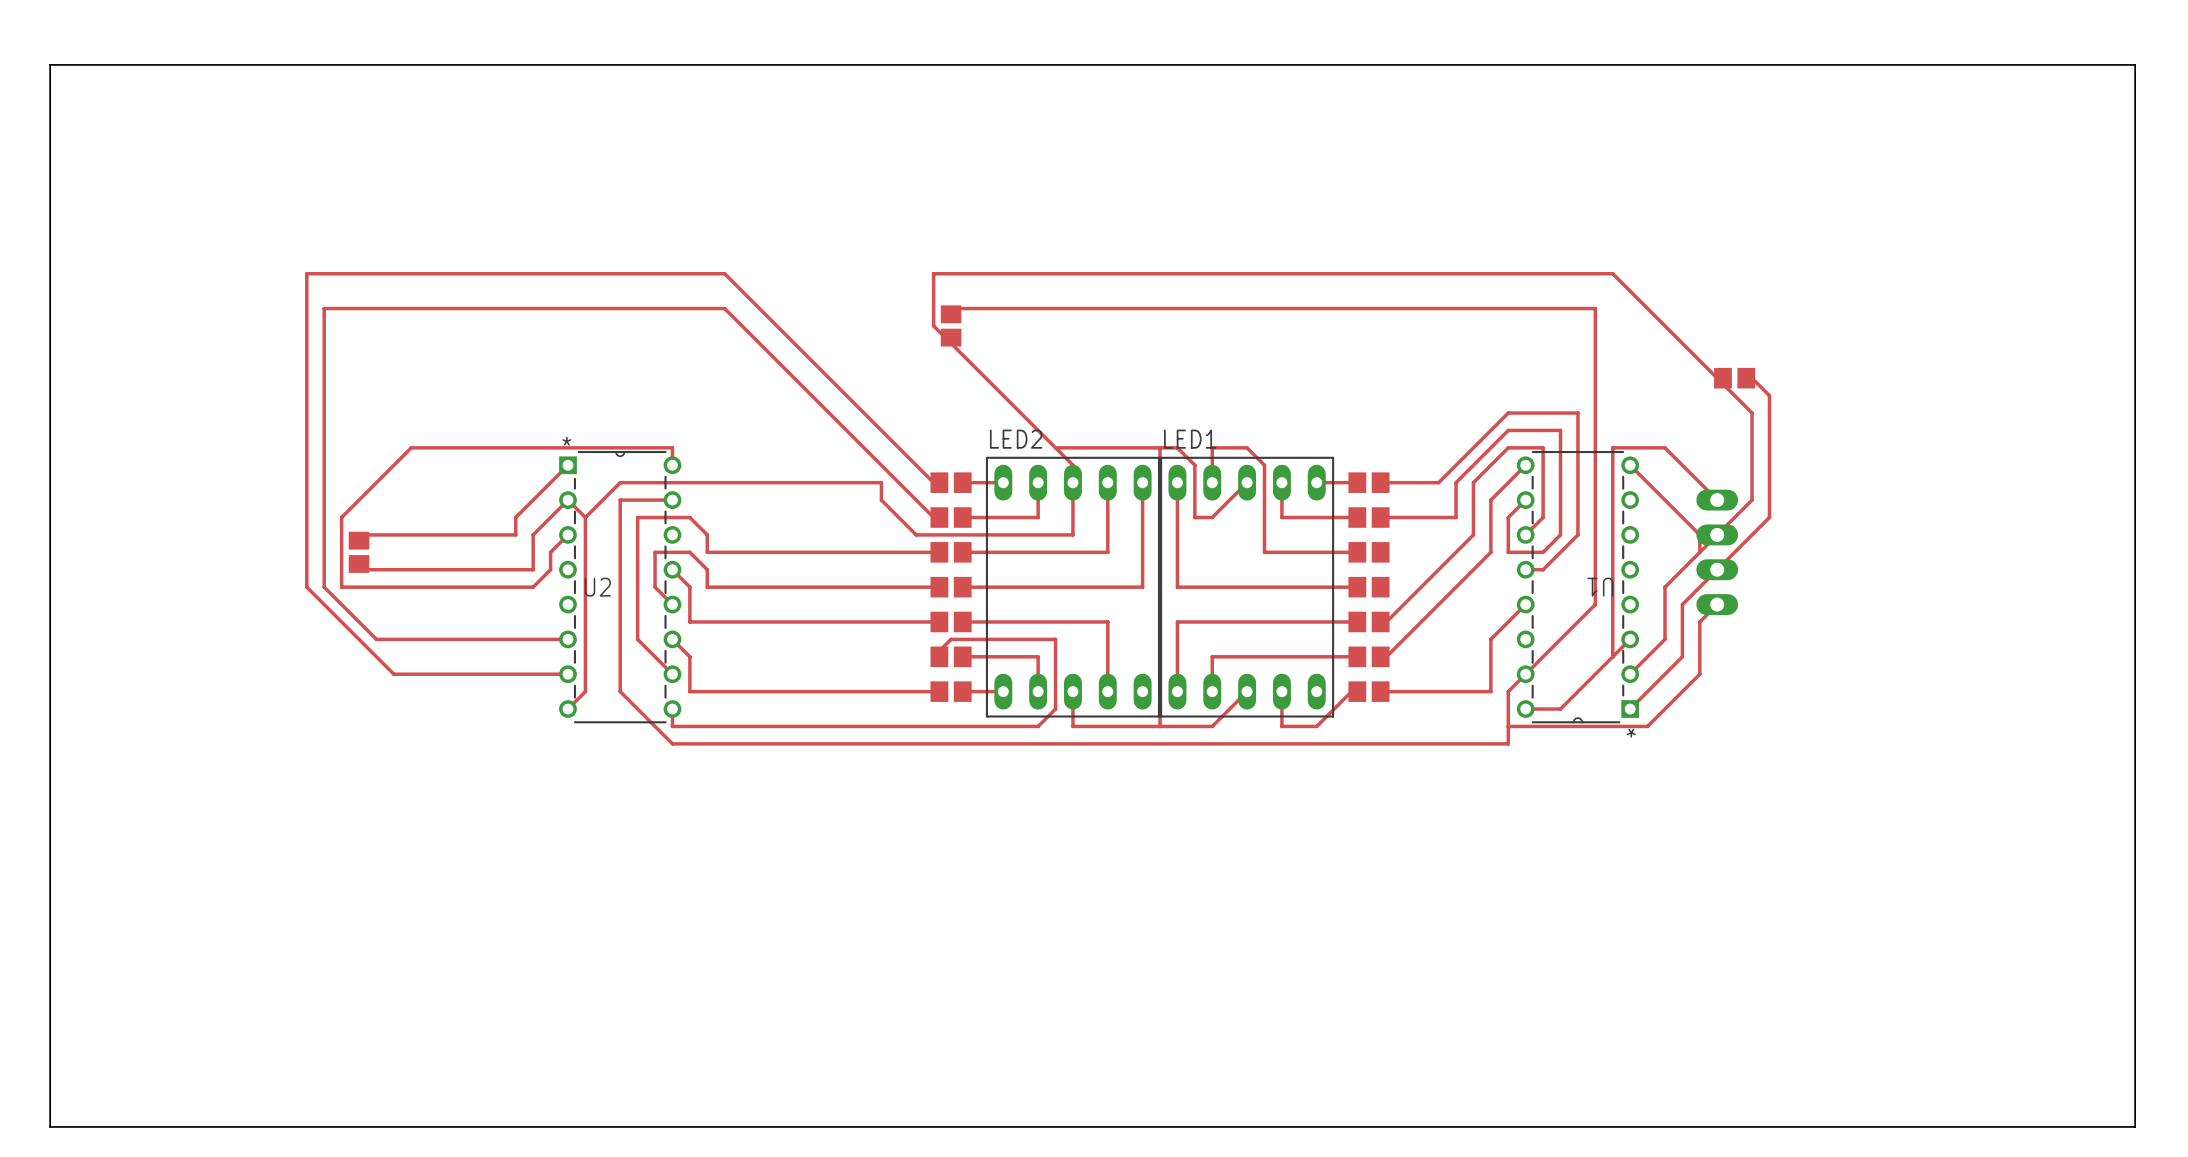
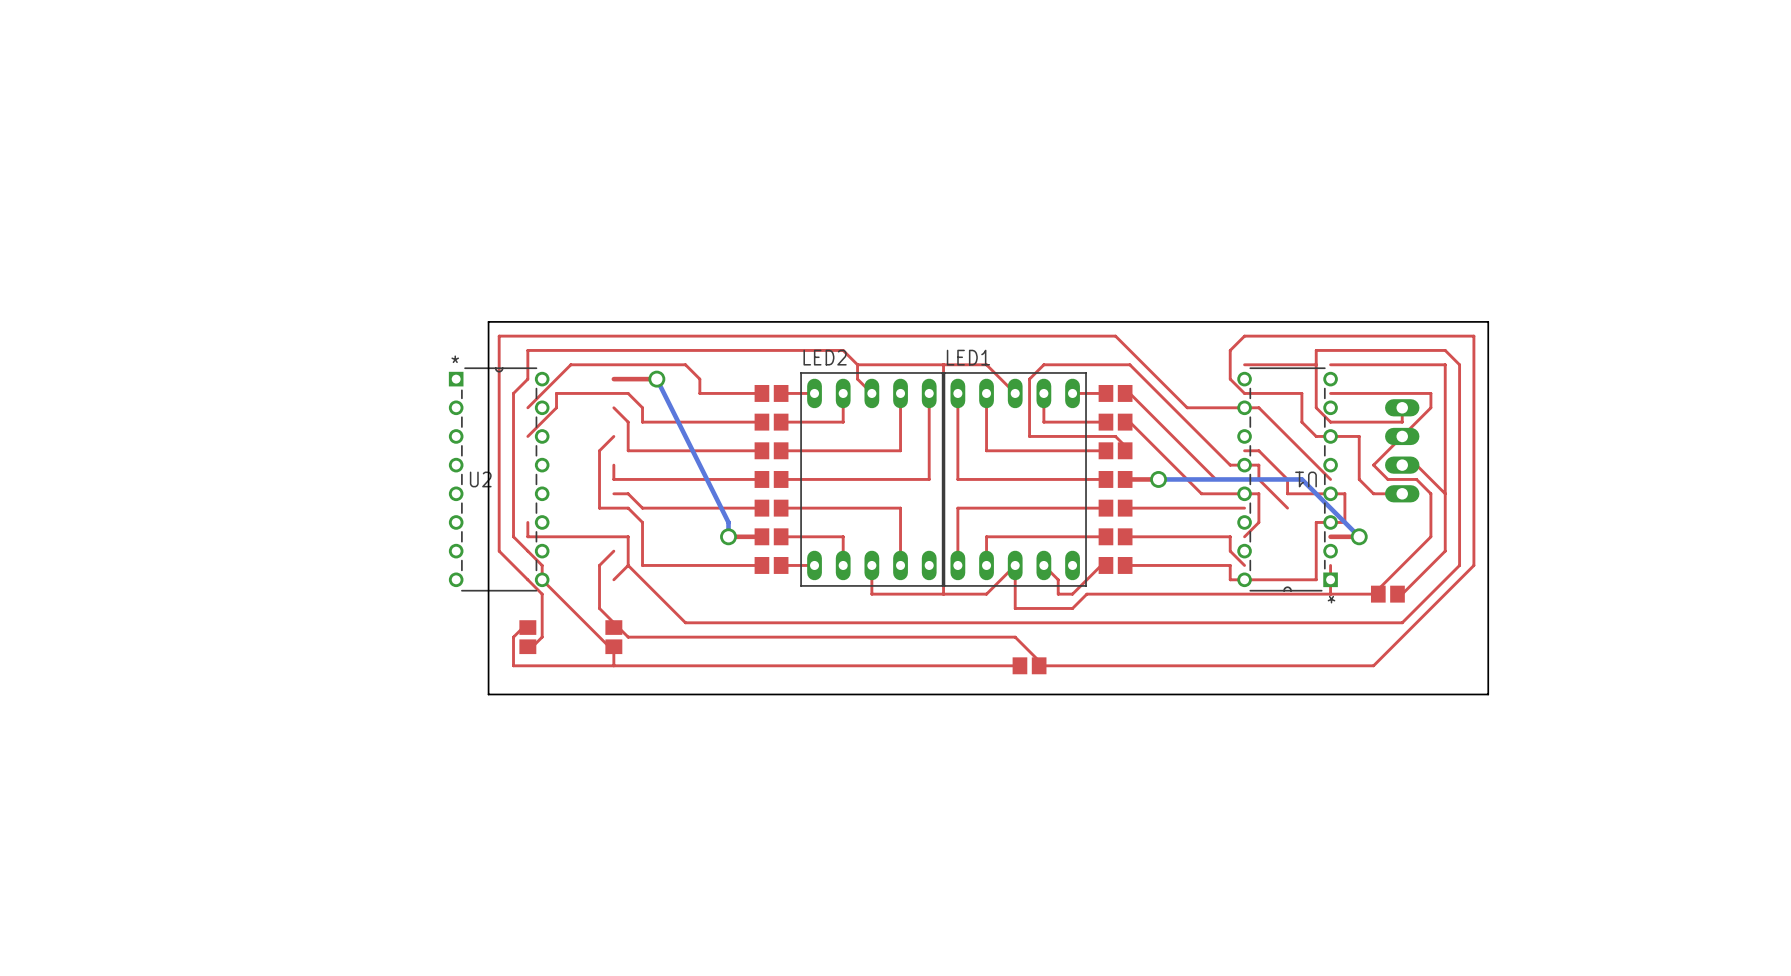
board edge: (2135, 64) (50, 64) (50, 1126) (2135, 1126) (2135, 64) -> none
top track: (951, 314) (951, 308) (1595, 308) (1595, 482) -> (1244, 336) (1230, 350) (1230, 379) (1244, 393) (1301, 393)
part: (951, 325) -> none
part: (1734, 378) -> none
top track: (1746, 378) (1752, 378) (1769, 395) (1769, 447) -> none
board edge: none -> (1488, 321) (488, 321) (488, 694) (1488, 694) (1488, 321)
top track: (1525, 413) (1508, 413) (1438, 482) (1386, 482) -> (1244, 479) (1215, 479) (1129, 393)
top track: (1577, 413) (1577, 534) (1543, 569) -> (1287, 508) (1258, 479) (1258, 465)
top track: none -> (1287, 336) (1473, 336) (1473, 565) (1373, 665) (1039, 665)
top track: (1038, 430) (933, 325) (933, 273) (1612, 273) (1752, 413) (1752, 482) -> (1330, 393) (1430, 393)
top track: none -> (843, 350) (527, 350) (527, 379) (513, 393) (513, 422)
top track: (1055, 447) (1072, 465) (1072, 534) (916, 534) (881, 500) (881, 482) -> (757, 393) (714, 393)
top track: none -> (857, 364) (857, 379) (871, 393)
top track: (1177, 447) (1194, 465) (1194, 517) (1212, 517) (1247, 482) -> (957, 364) (986, 364) (1015, 393)
top track: (1525, 447) (1508, 447) (1473, 482) (1473, 534) (1386, 621) -> (1244, 508) (1129, 508)
top track: (1543, 447) (1543, 517) (1525, 534) -> (1258, 364) (1316, 364) (1316, 350) (1445, 350) (1459, 364) (1459, 565) (1402, 622) (685, 622) (628, 565)
top track: (1630, 447) (1612, 447) -> (1244, 579) (1230, 579)
top track: (1664, 447) (1717, 500) -> (1359, 364) (1445, 364)
top track: (567, 465) (515, 517) (515, 534) (359, 534) (359, 540) -> none
top track: (672, 465) (672, 447) (411, 447) (341, 517) (341, 587) (533, 587) (550, 569) (550, 552) (567, 534) -> none
top track: none -> (656, 379) (613, 379)
bottom track: none -> (656, 379) (728, 522) (728, 536)
via: none -> (656, 379)
top track: (1264, 465) (1247, 447) (1212, 447) (1212, 482) -> (1029, 379) (1043, 364) (1129, 364) (1230, 465) (1244, 465)
top track: (1525, 465) (1490, 500) (1490, 552) (1386, 656) -> (1244, 565) (1230, 551) (1230, 536) (1129, 536)
top track: (1630, 465) (1699, 534) (1699, 552) -> none
top track: (689, 482) (620, 482) (585, 517) -> (556, 393) (556, 407) (527, 436)
top track: (864, 482) (776, 482) -> (757, 422) (642, 422) (642, 407) (628, 393)
top track: none -> (699, 393) (699, 379) (685, 364) (570, 364) (527, 407)
top track: (933, 482) (724, 273) (306, 273) (306, 587) (393, 674) (567, 674) -> none
top track: (672, 500) (620, 500) -> (1330, 479) (1258, 407) (1187, 407) (1115, 336) (499, 336) (499, 407)
top track: (1525, 500) (1508, 517) (1508, 552) (1525, 552) -> none
top track: (1612, 500) (1612, 639) -> (1258, 450) (1287, 479) (1287, 493) (1344, 493) (1344, 522) (1316, 522)
top track: none -> (1402, 407) (1402, 422) (1330, 422) (1316, 407)
top track: (585, 517) (585, 691) (567, 709) -> none
top track: (585, 517) (567, 500) (533, 534) (533, 569) (359, 569) (359, 563) -> none
top track: (637, 517) (689, 517) (707, 534) (707, 552) (776, 552) -> (613, 407) (628, 422) (628, 450)
top track: (933, 517) (724, 308) (324, 308) (324, 587) (376, 639) (567, 639) -> none
top track: (1386, 517) (1456, 517) (1456, 482) (1508, 430) (1560, 430) (1560, 534) (1543, 552) -> (1129, 422) (1201, 493) (1258, 493) (1258, 522) (1244, 536)
top track: (1595, 517) (1595, 604) (1508, 691) -> (1301, 422) (1316, 436) (1359, 436) (1359, 479) (1373, 493) (1402, 493)
top track: (1769, 517) (1682, 604) (1682, 656) (1630, 709) -> (1445, 422) (1445, 551) (1402, 594) (1397, 594)
top track: (1264, 534) (1264, 552) -> (986, 393) (986, 450) (1029, 450)
top track: none -> (1029, 436) (1115, 436) (1129, 450) (1125, 450)
part: (359, 552) -> none
top track: (672, 569) (689, 587) (689, 621) (742, 621) -> (613, 436) (599, 450) (599, 508)
top track: (1682, 569) (1664, 587) (1664, 639) (1630, 674) -> (1373, 465) (1387, 479) (1416, 479) (1430, 493) (1430, 536) (1373, 594)
top track: none -> (1402, 465) (1416, 465) (1445, 493)
top track: (759, 587) (707, 587) (707, 569) (689, 552) (655, 552) (655, 587) (672, 604) -> (613, 479) (613, 465)
top track: none -> (1158, 479) (1125, 479)
bottom track: none -> (1158, 479) (1301, 479) (1359, 536)
via: none -> (1158, 479)
top track: (1525, 604) (1490, 639) (1490, 691) -> (1230, 565) (1215, 565)
top track: (1717, 604) (1699, 621) (1699, 674) (1647, 726) -> (1378, 594) (1344, 594)
top track: (794, 621) (776, 621) -> (642, 508) (628, 493) (613, 493)
top track: (637, 639) (672, 674) -> (513, 522) (513, 536) (542, 565) (542, 579) (613, 651)
top track: none -> (527, 522) (527, 536) (628, 536) (628, 565)
top track: (672, 639) (689, 656) (689, 691) (794, 691) -> (628, 508) (642, 522) (642, 565)
top track: (1630, 639) (1560, 709) -> (1316, 536) (1316, 579) (1273, 579)
via: none -> (728, 536)
top track: (933, 656) (951, 639) (1055, 639) (1055, 709) (1038, 726) (672, 726) (672, 709) -> (757, 536) (728, 536)
top track: none -> (1359, 536) (1330, 536)
via: none -> (1359, 536)
top track: (620, 674) (620, 691) (672, 743) (1247, 743) -> (499, 551) (542, 594) (542, 637) (527, 651) (527, 646)
top track: none -> (613, 551) (599, 565) (599, 608) (628, 637) (1015, 637) (1043, 665)
top track: none -> (628, 565) (613, 579)
top track: none -> (1015, 565) (1015, 608)
top track: (1281, 691) (1281, 726) (1299, 726) -> (1043, 565) (1058, 579) (1058, 594)
top track: none -> (1330, 565) (1330, 594)
top track: (1508, 709) (1508, 743) (1316, 743) -> (1230, 594) (1086, 594) (1072, 608)
part: none -> (1387, 594)
top track: none -> (527, 627) (527, 622) (513, 637) (513, 665) (1019, 665)
part: none -> (527, 637)
part: none -> (613, 637)
top track: none -> (613, 646) (613, 665)
part: none -> (1029, 665)

